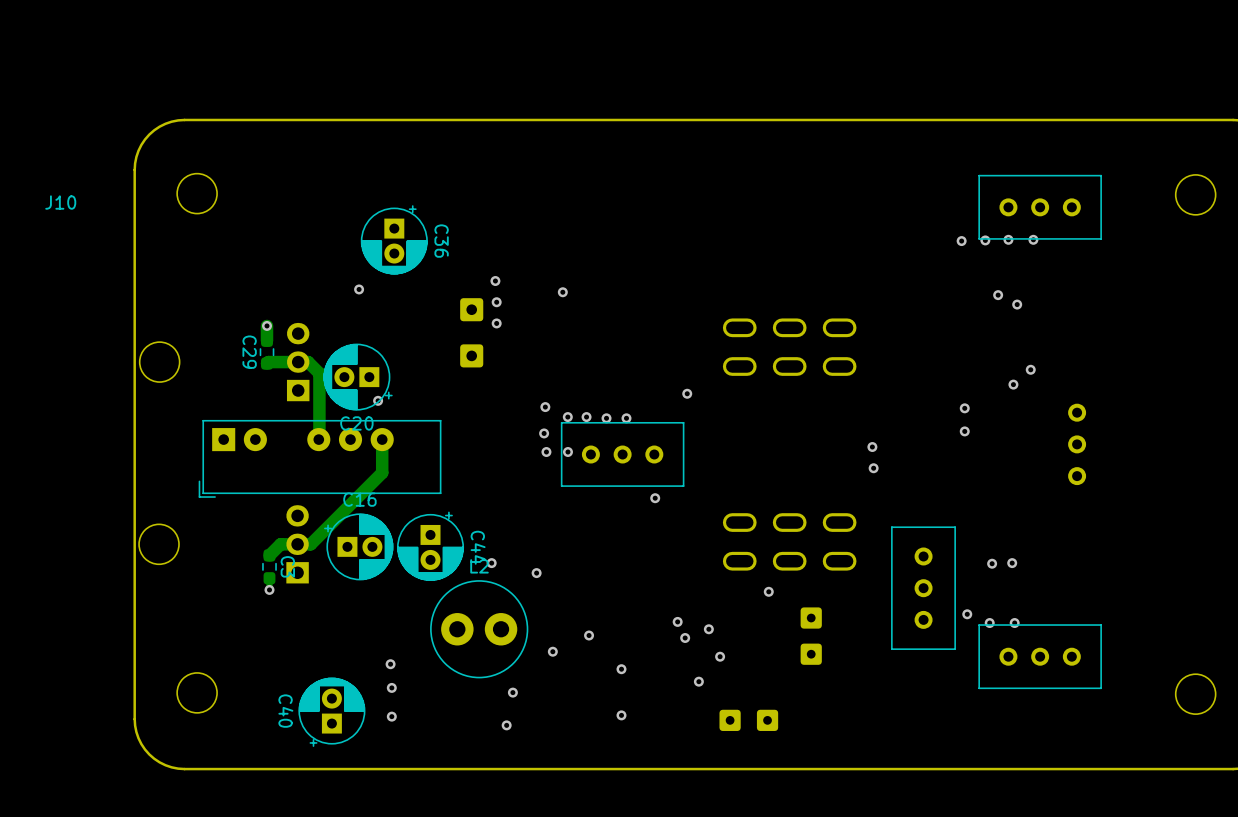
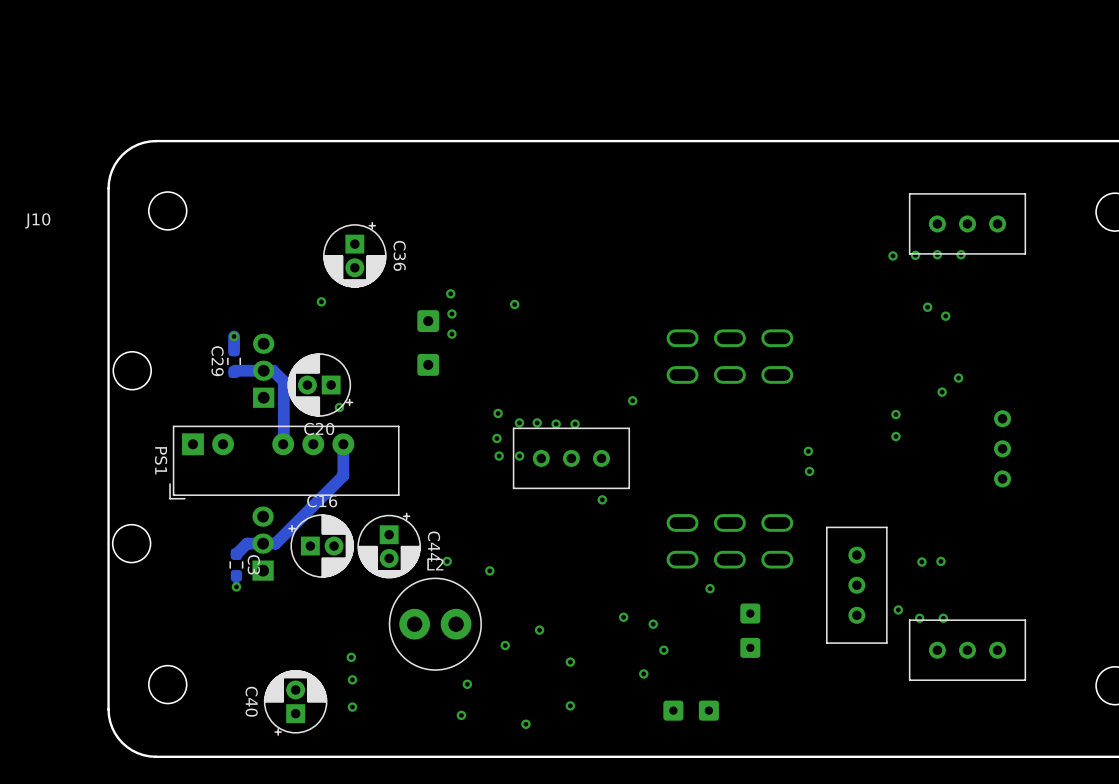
PS1 name: none -> PS1 (161, 460)
via: (685, 637) -> none
via: none -> (525, 724)

